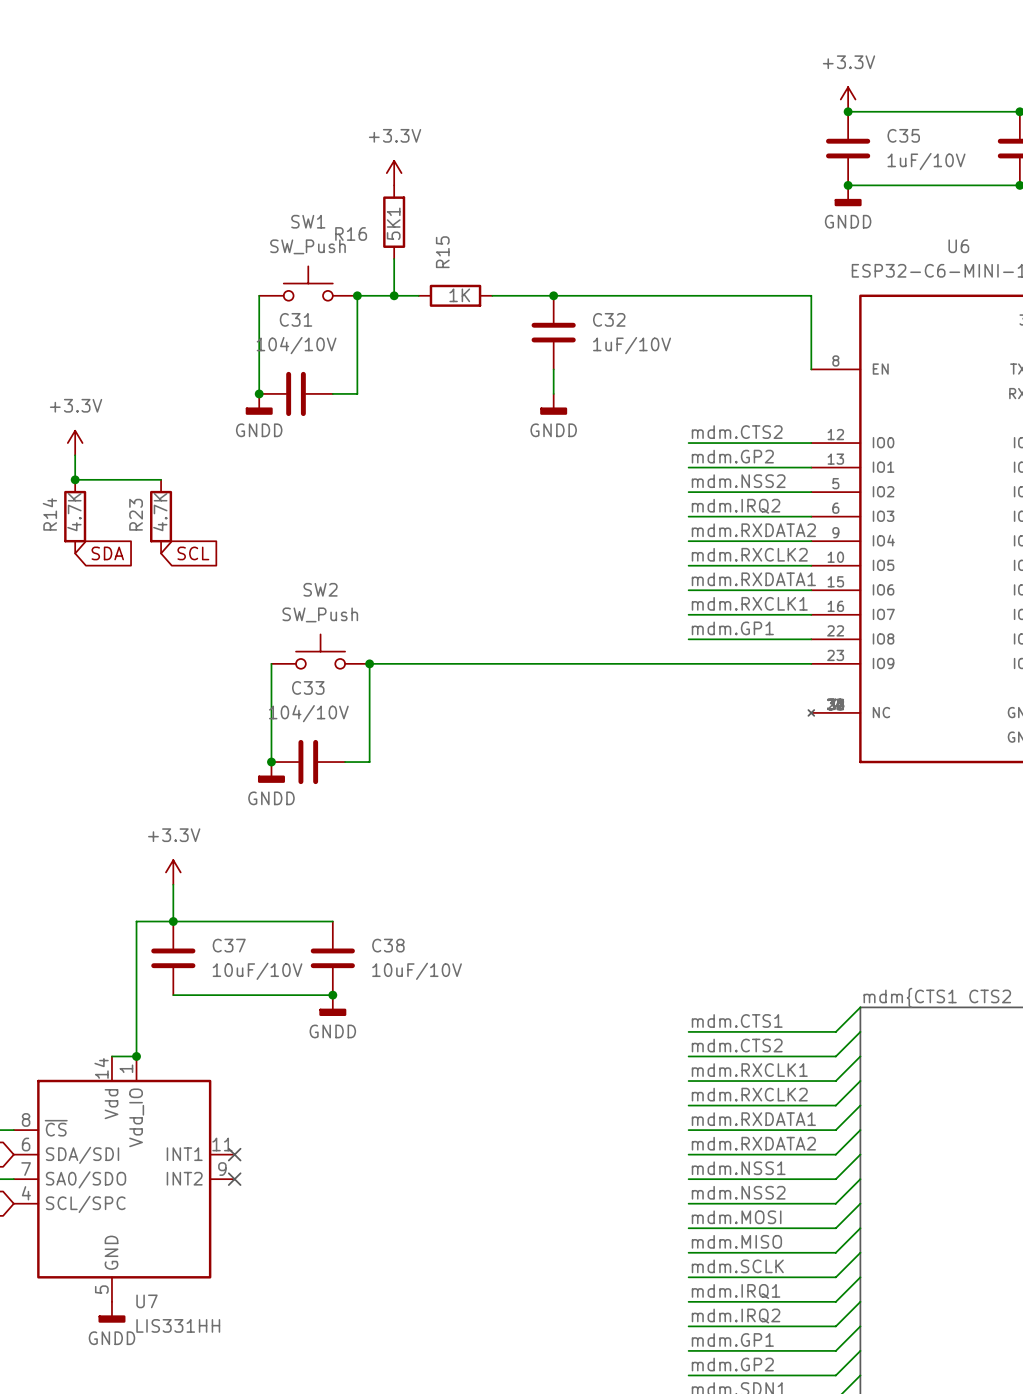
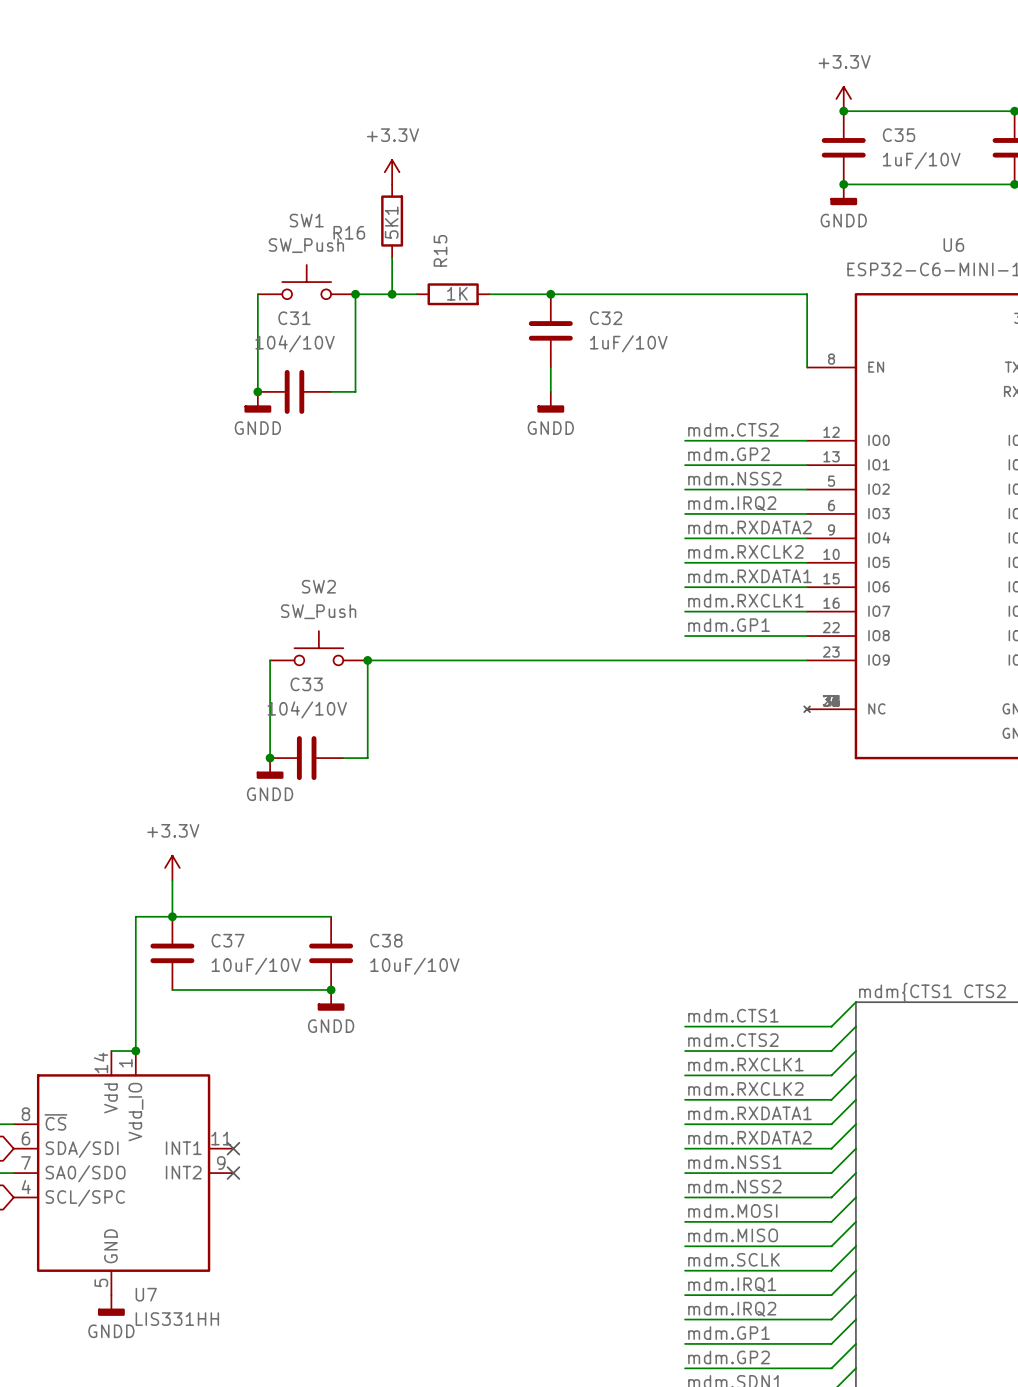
power symbol: +3.3V (75, 443) -> none
wire: (75, 455) (75, 479) (161, 479) -> none
junction: (75, 479) -> none
R14: 4.7K (75, 516) -> none
R23: 4.7K (161, 516) -> none
global label: SDA (107, 553) -> none
global label: SCL (193, 553) -> none

